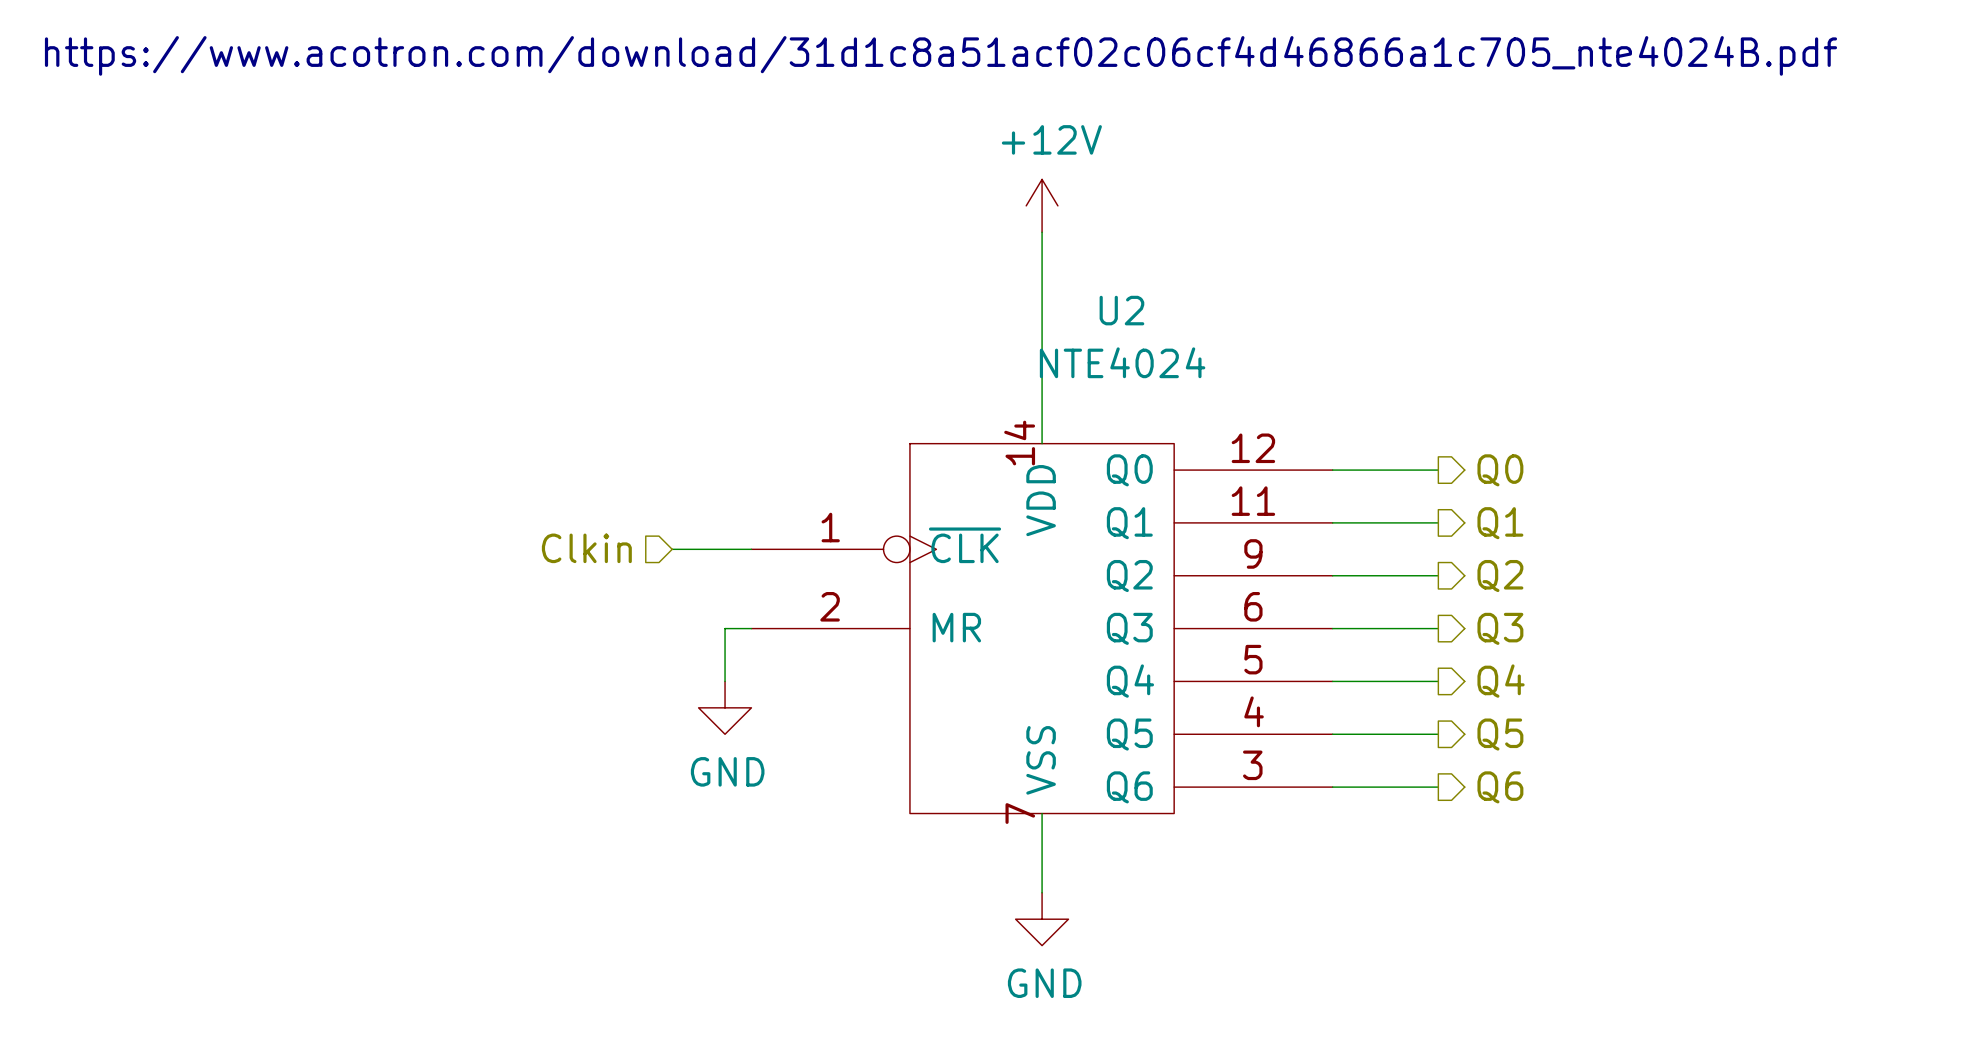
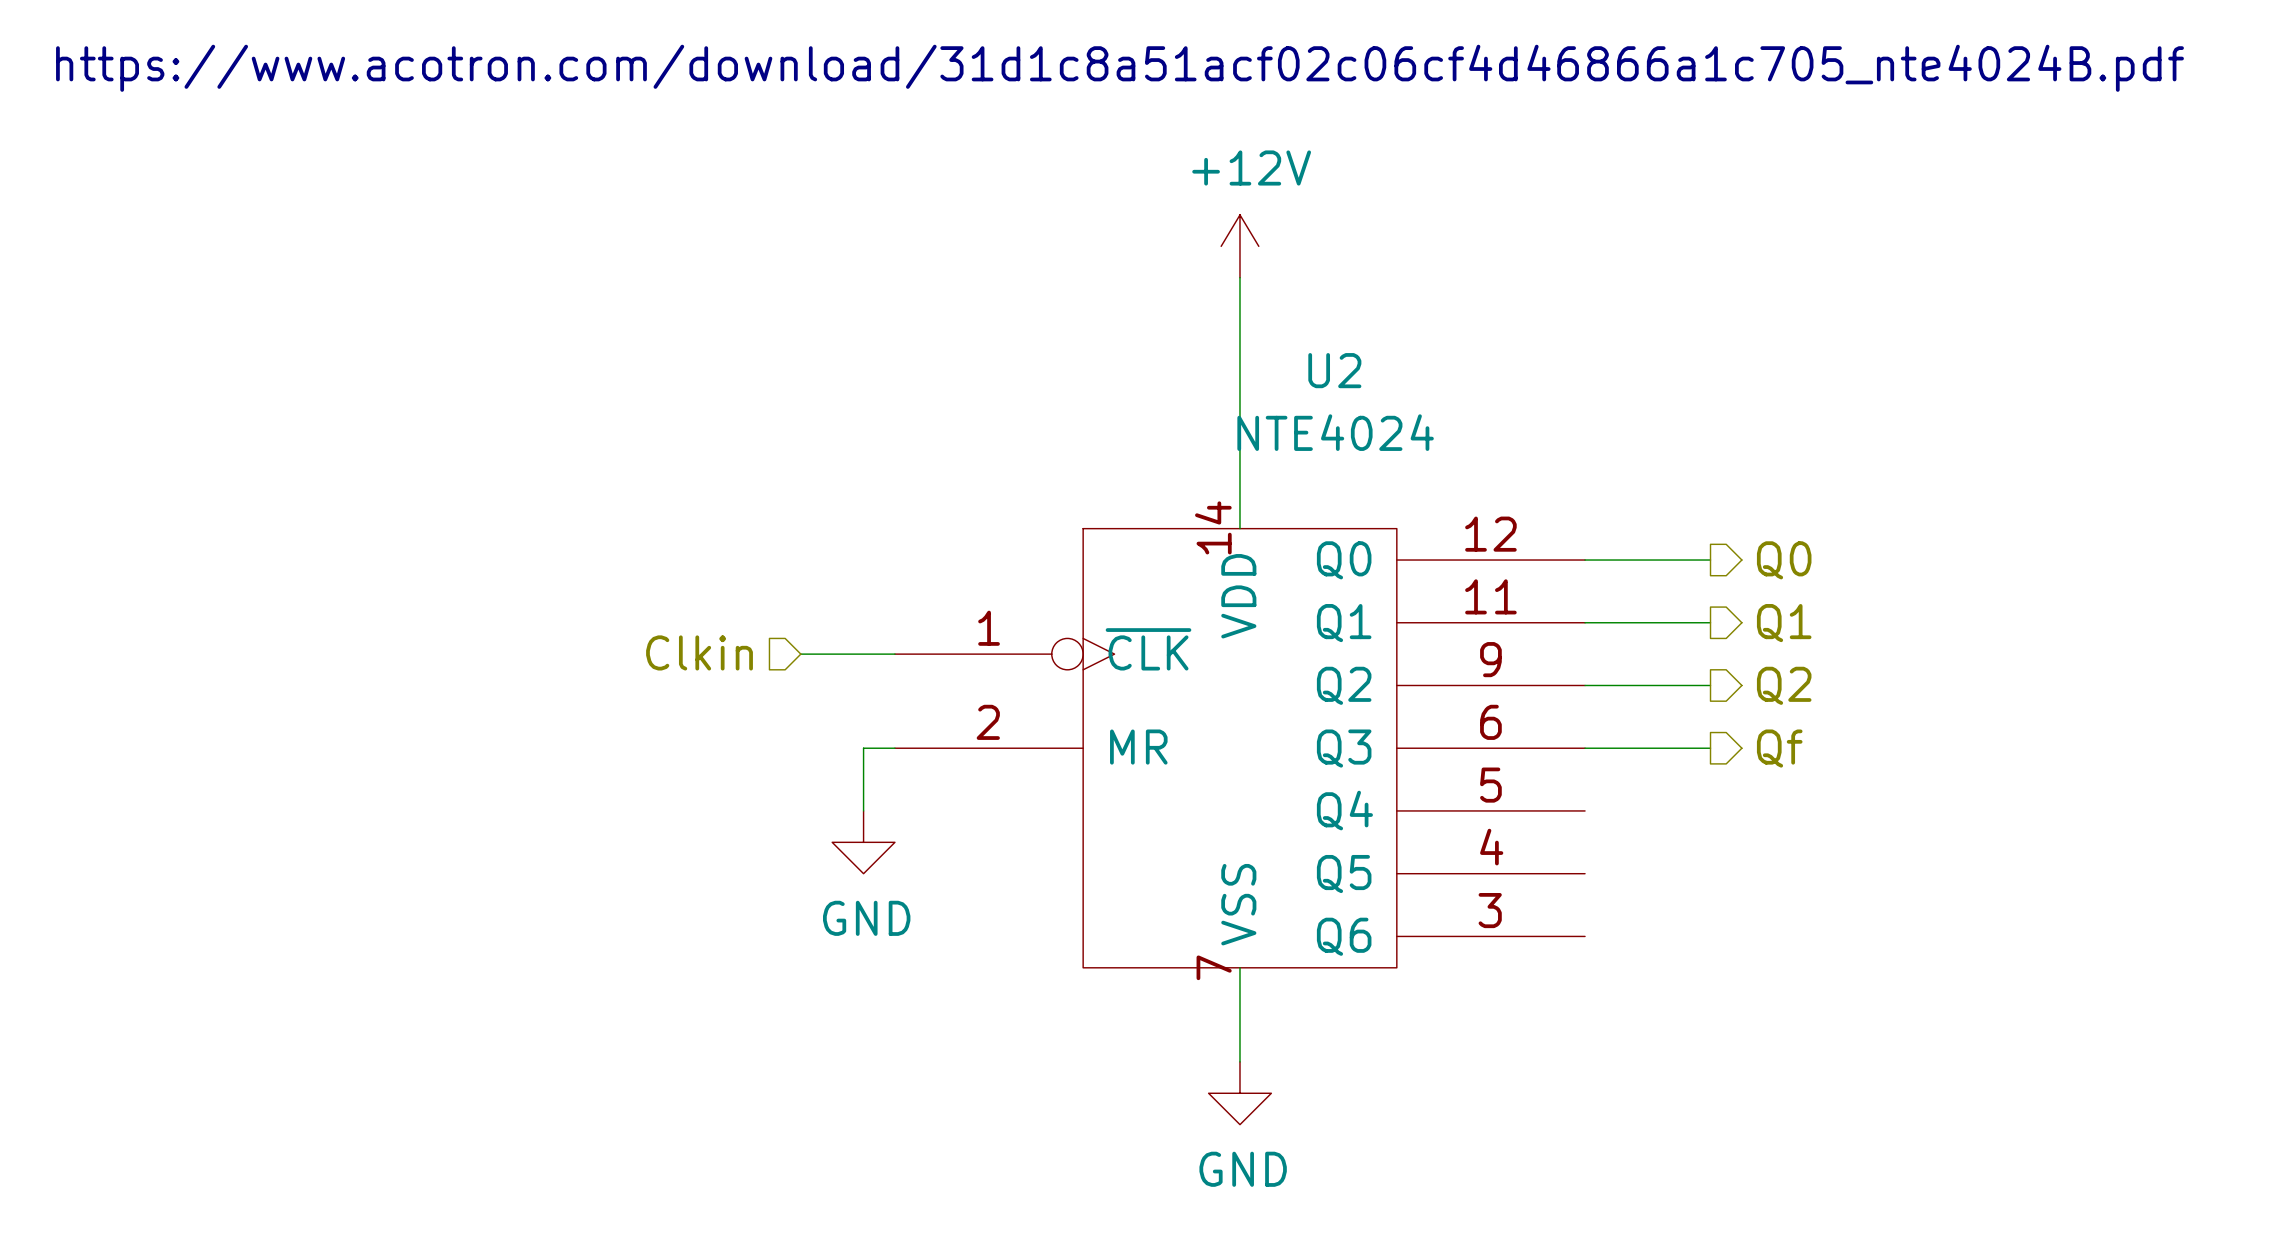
hierarchical label: Q3 (1500, 628) -> Qf (1779, 748)
wire: (1332, 681) (1438, 681) -> none
hierarchical label: Q4 (1501, 681) -> none
wire: (1332, 734) (1438, 734) -> none
hierarchical label: Q5 (1500, 734) -> none
wire: (1332, 787) (1438, 787) -> none
hierarchical label: Q6 (1500, 787) -> none

